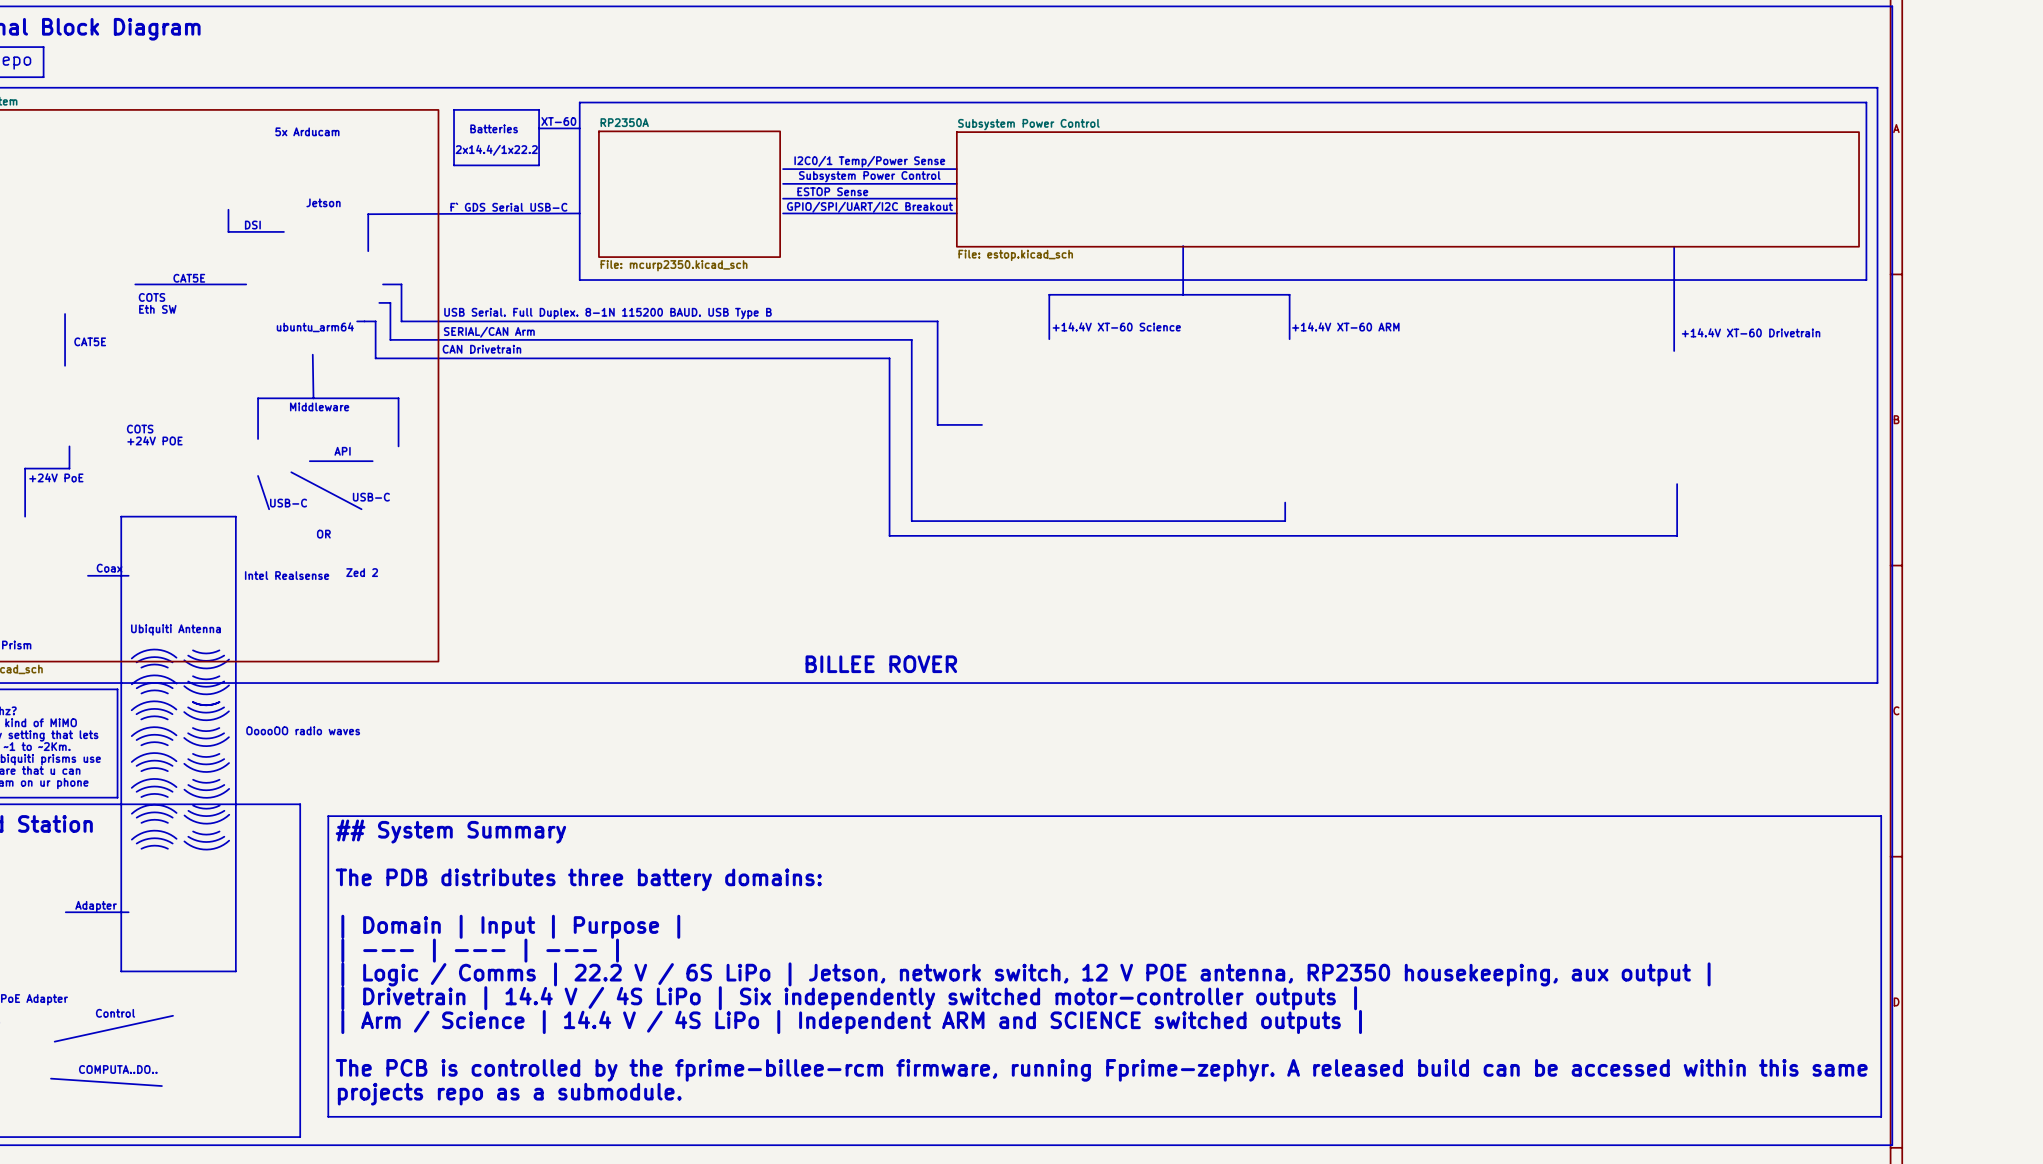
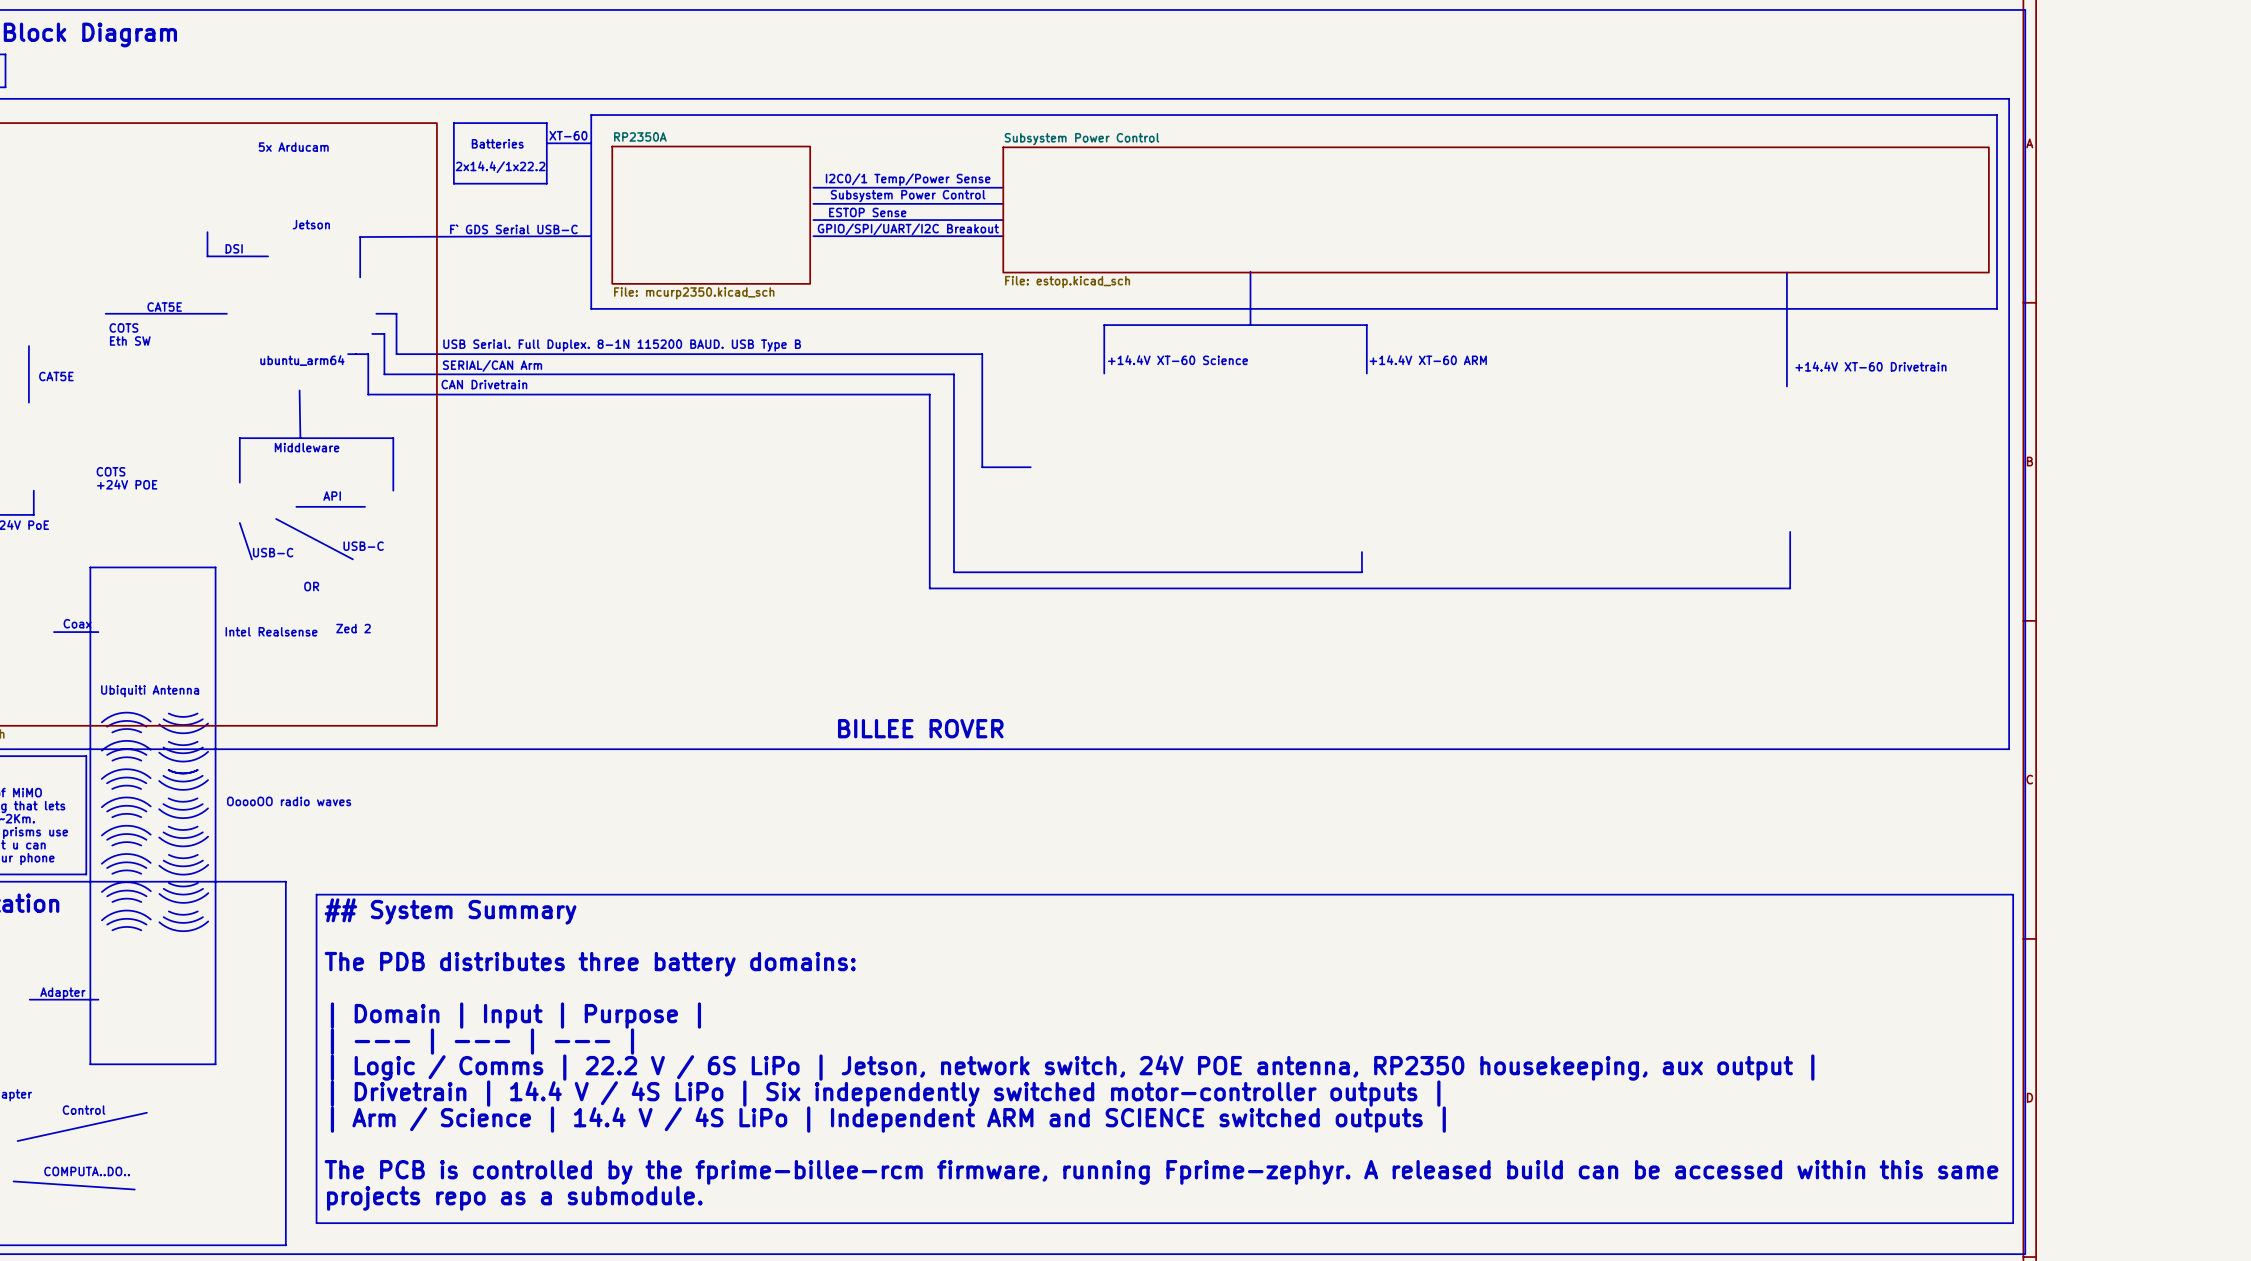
text: | Logic / Comms | 22.2 V / 6S LiPo | Jetson, network switch, 12 V POE antenna, RP2350 housekeeping, aux output | (1025, 974) -> | Logic / Comms | 22.2 V / 6S LiPo | Jetson, network switch, 24V POE antenna, RP2350 housekeeping, aux output | (1072, 1067)

